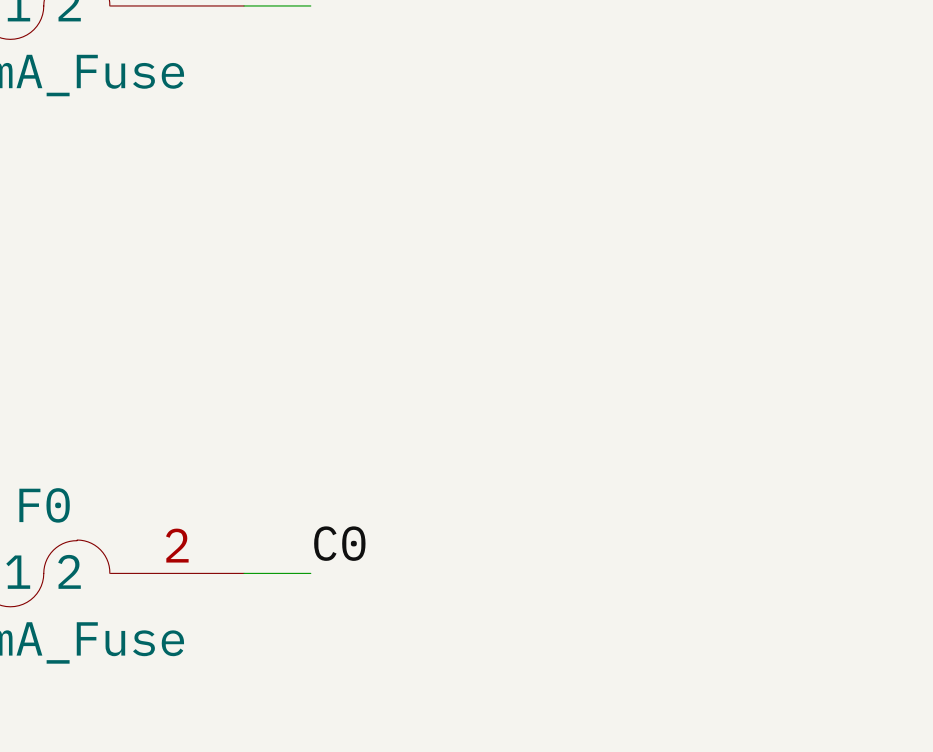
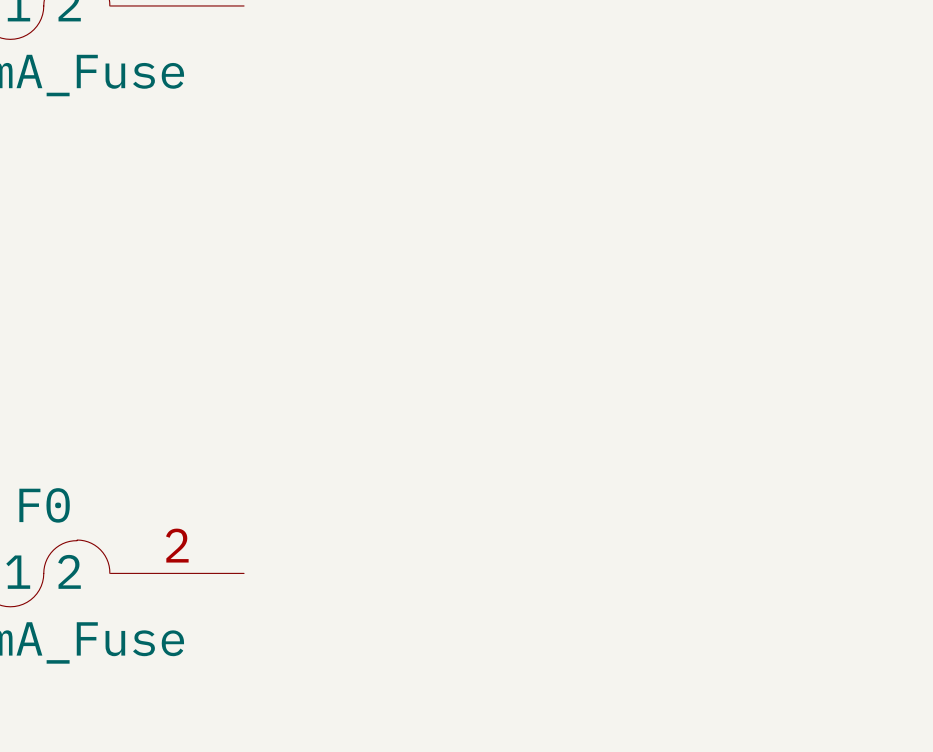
wire: (244, 5) (310, 5) -> none
label: C0 (339, 543) -> none
wire: (244, 573) (310, 573) -> none

